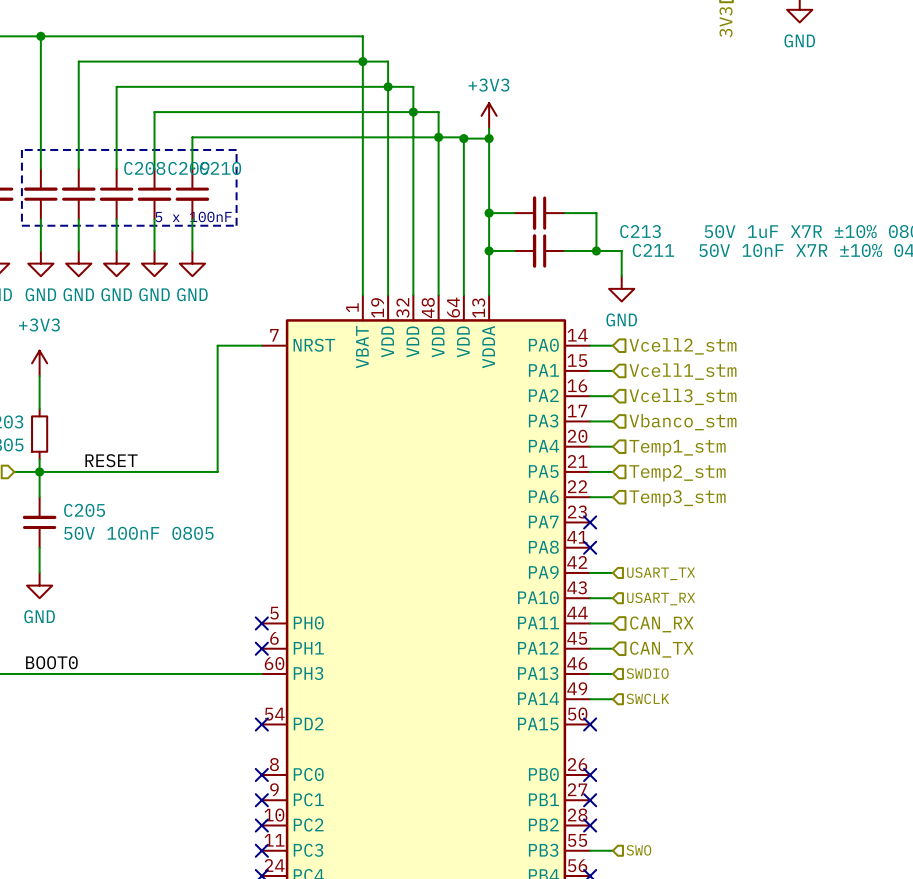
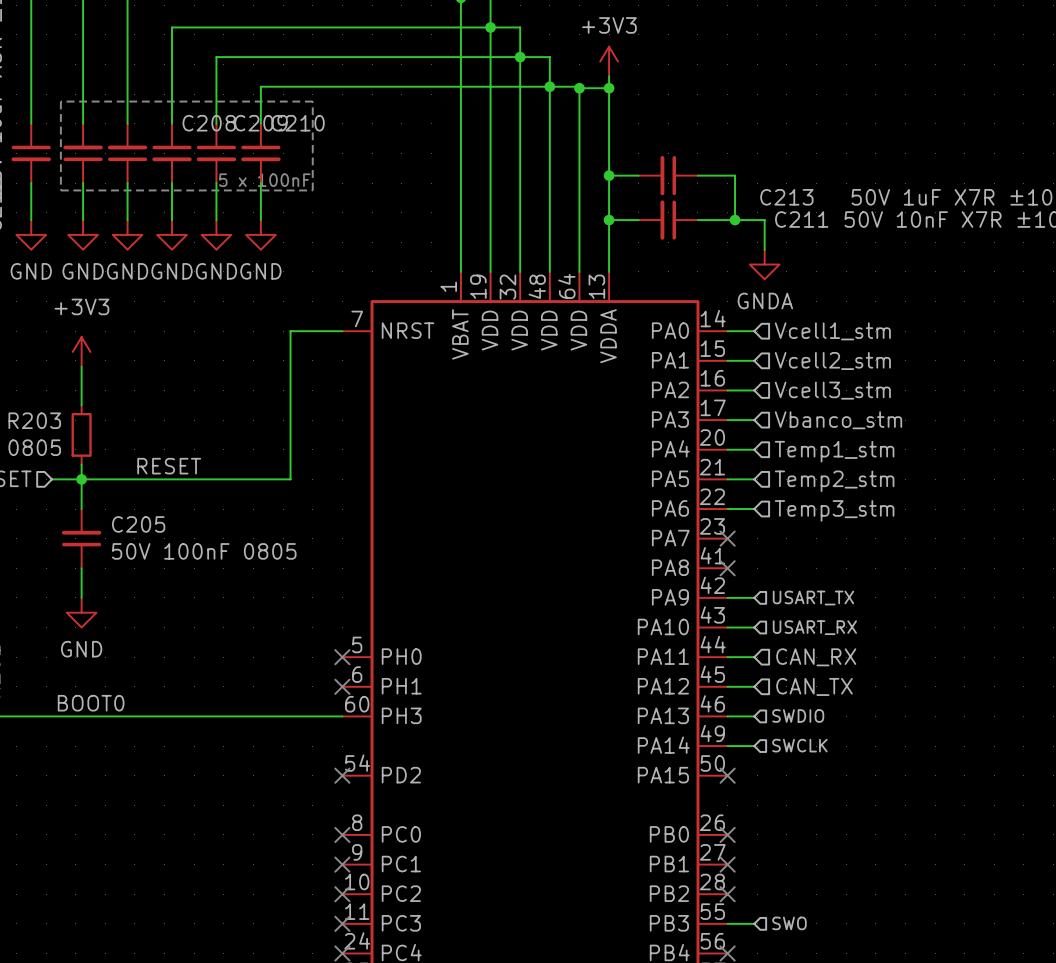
power symbol: GND (621, 288) -> GNDA (764, 264)
hierarchical label: Vcell2_stm (683, 346) -> Vcell1_stm (832, 331)
hierarchical label: Vcell1_stm (683, 371) -> Vcell2_stm (832, 360)

